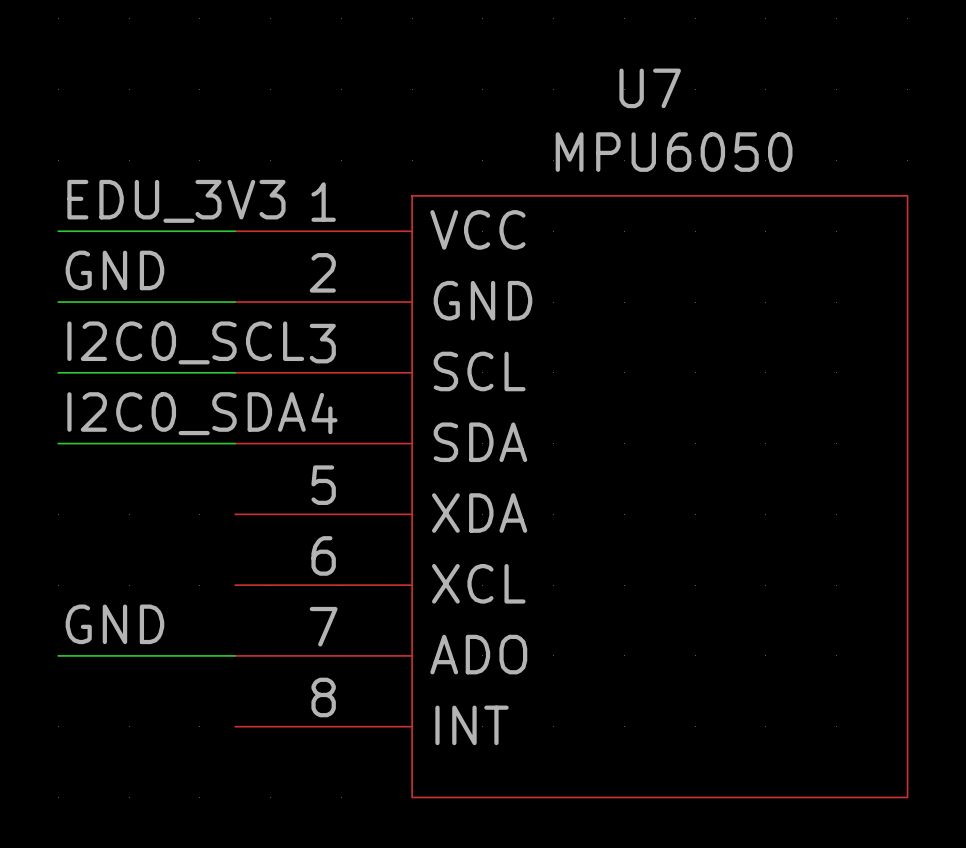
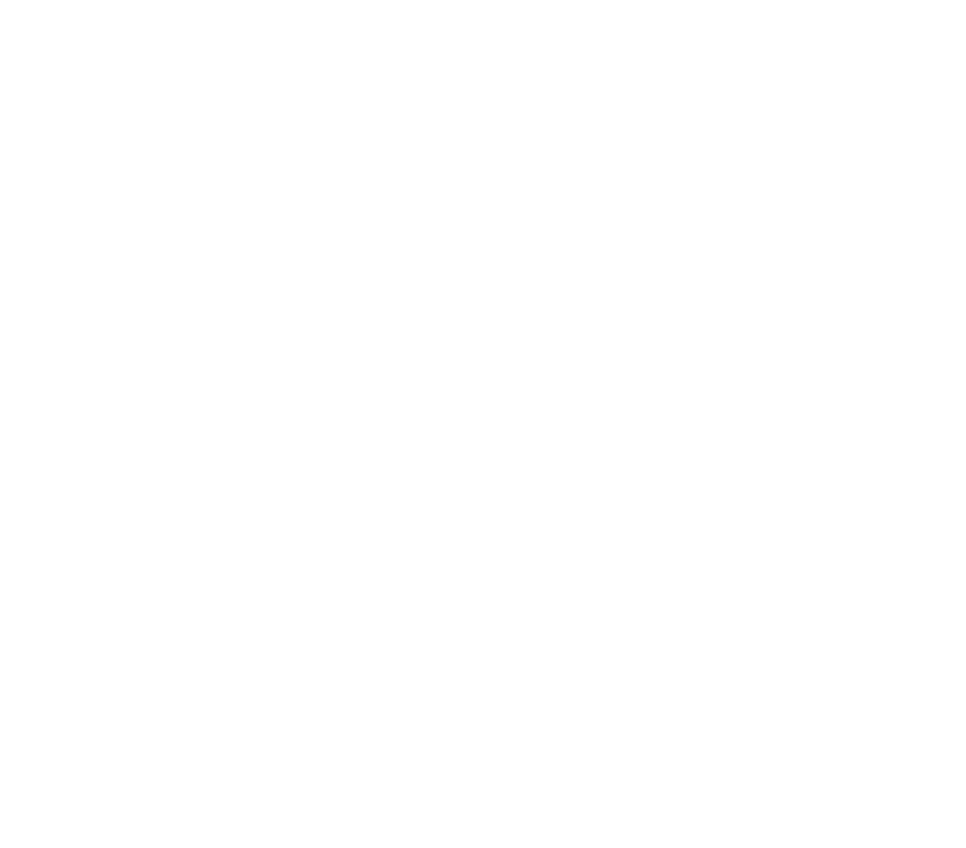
label: EDU_3V3 (176, 201) -> none
wire: (58, 231) (235, 231) -> none
label: GND (114, 270) -> none
wire: (58, 302) (235, 302) -> none
label: I2C0_SCL (185, 342) -> none
wire: (58, 372) (235, 372) -> none
label: I2C0_SDA (186, 413) -> none
wire: (58, 443) (235, 443) -> none
U7: MPU6050 (571, 496) -> none
label: GND (114, 624) -> none
wire: (58, 655) (235, 655) -> none

